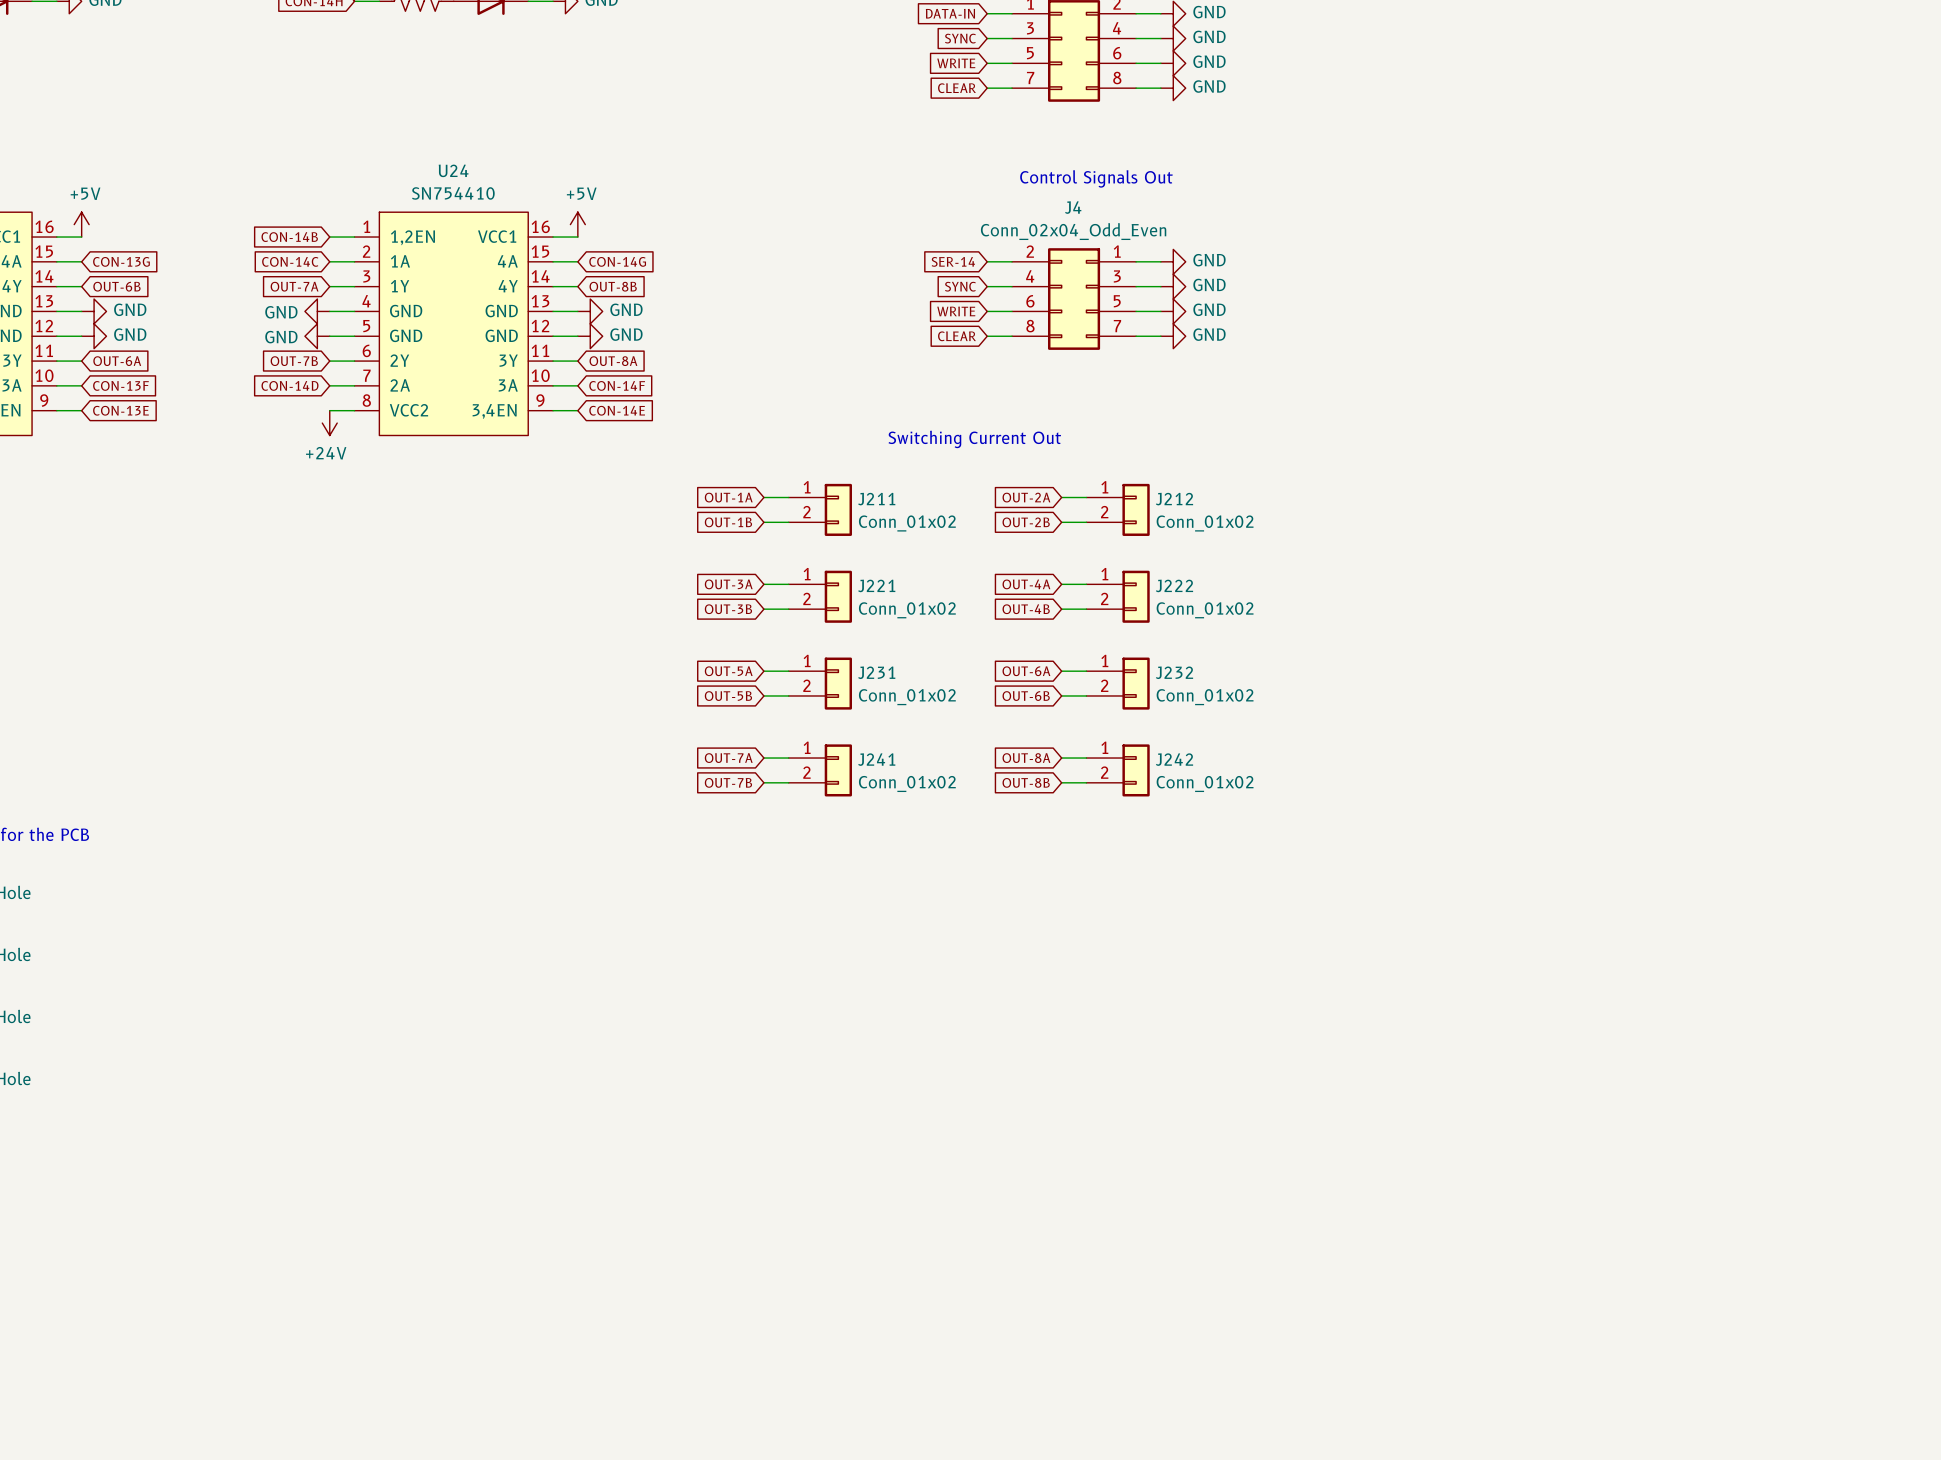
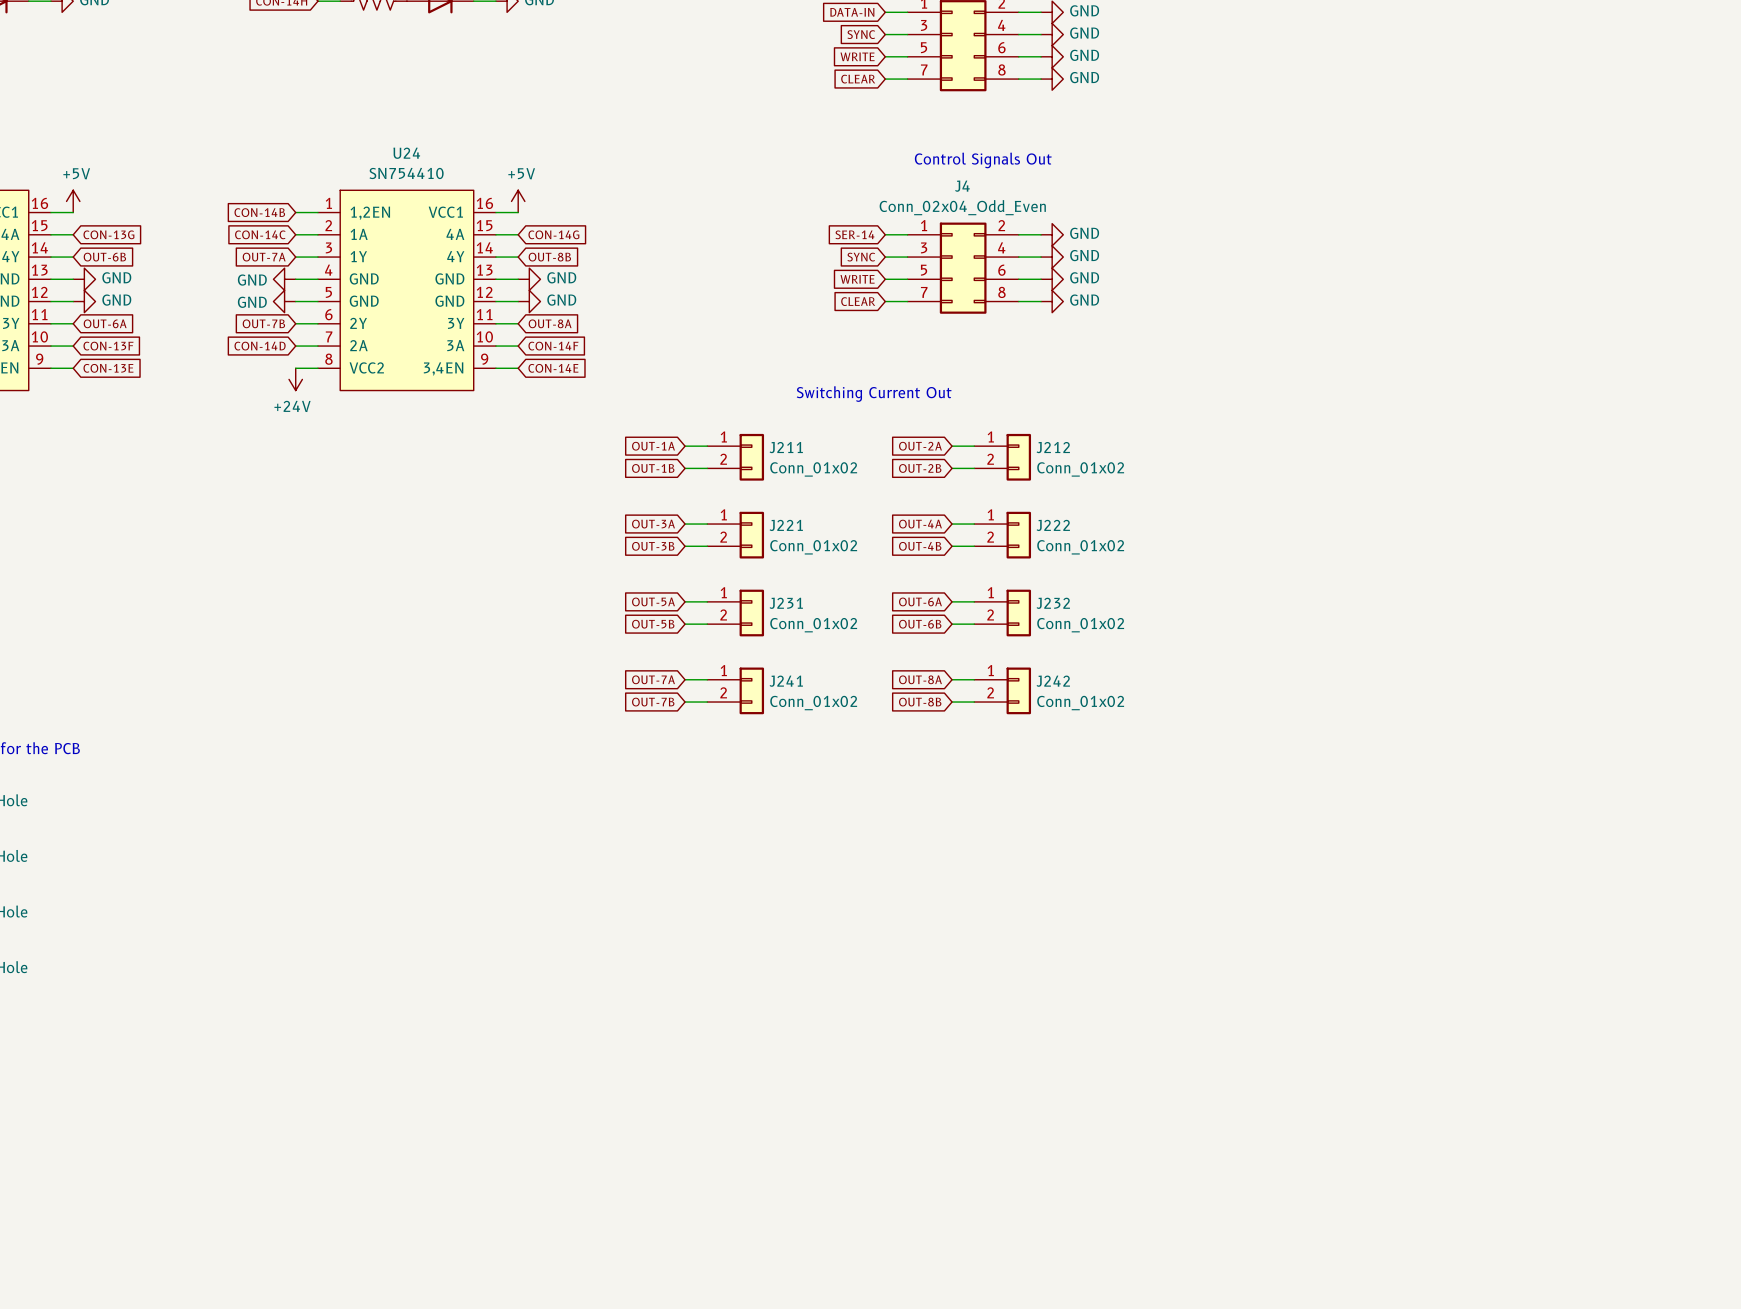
J4 flip: as is (1074, 299) -> left-right (963, 268)

